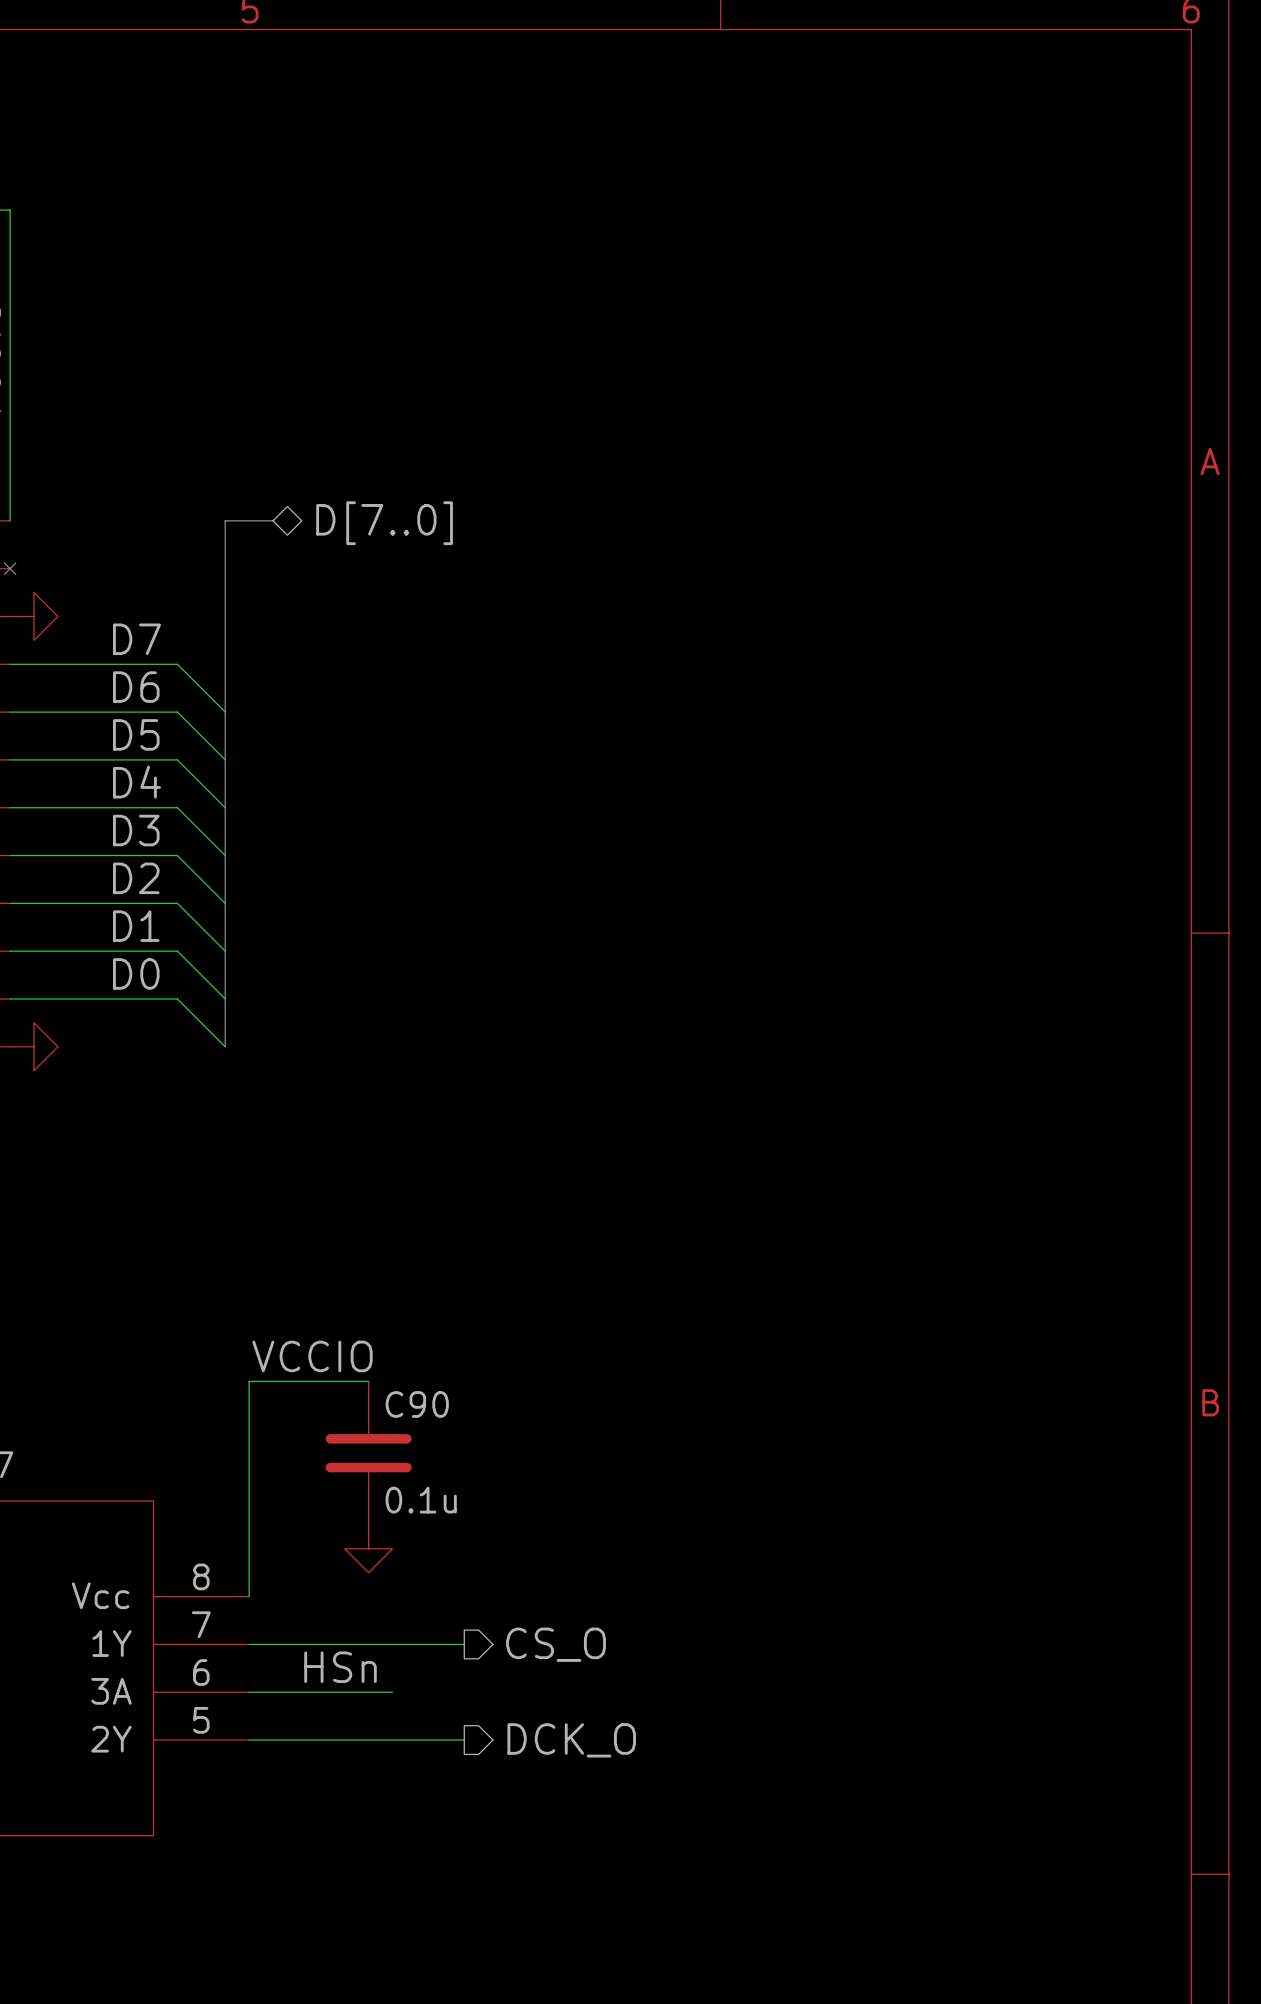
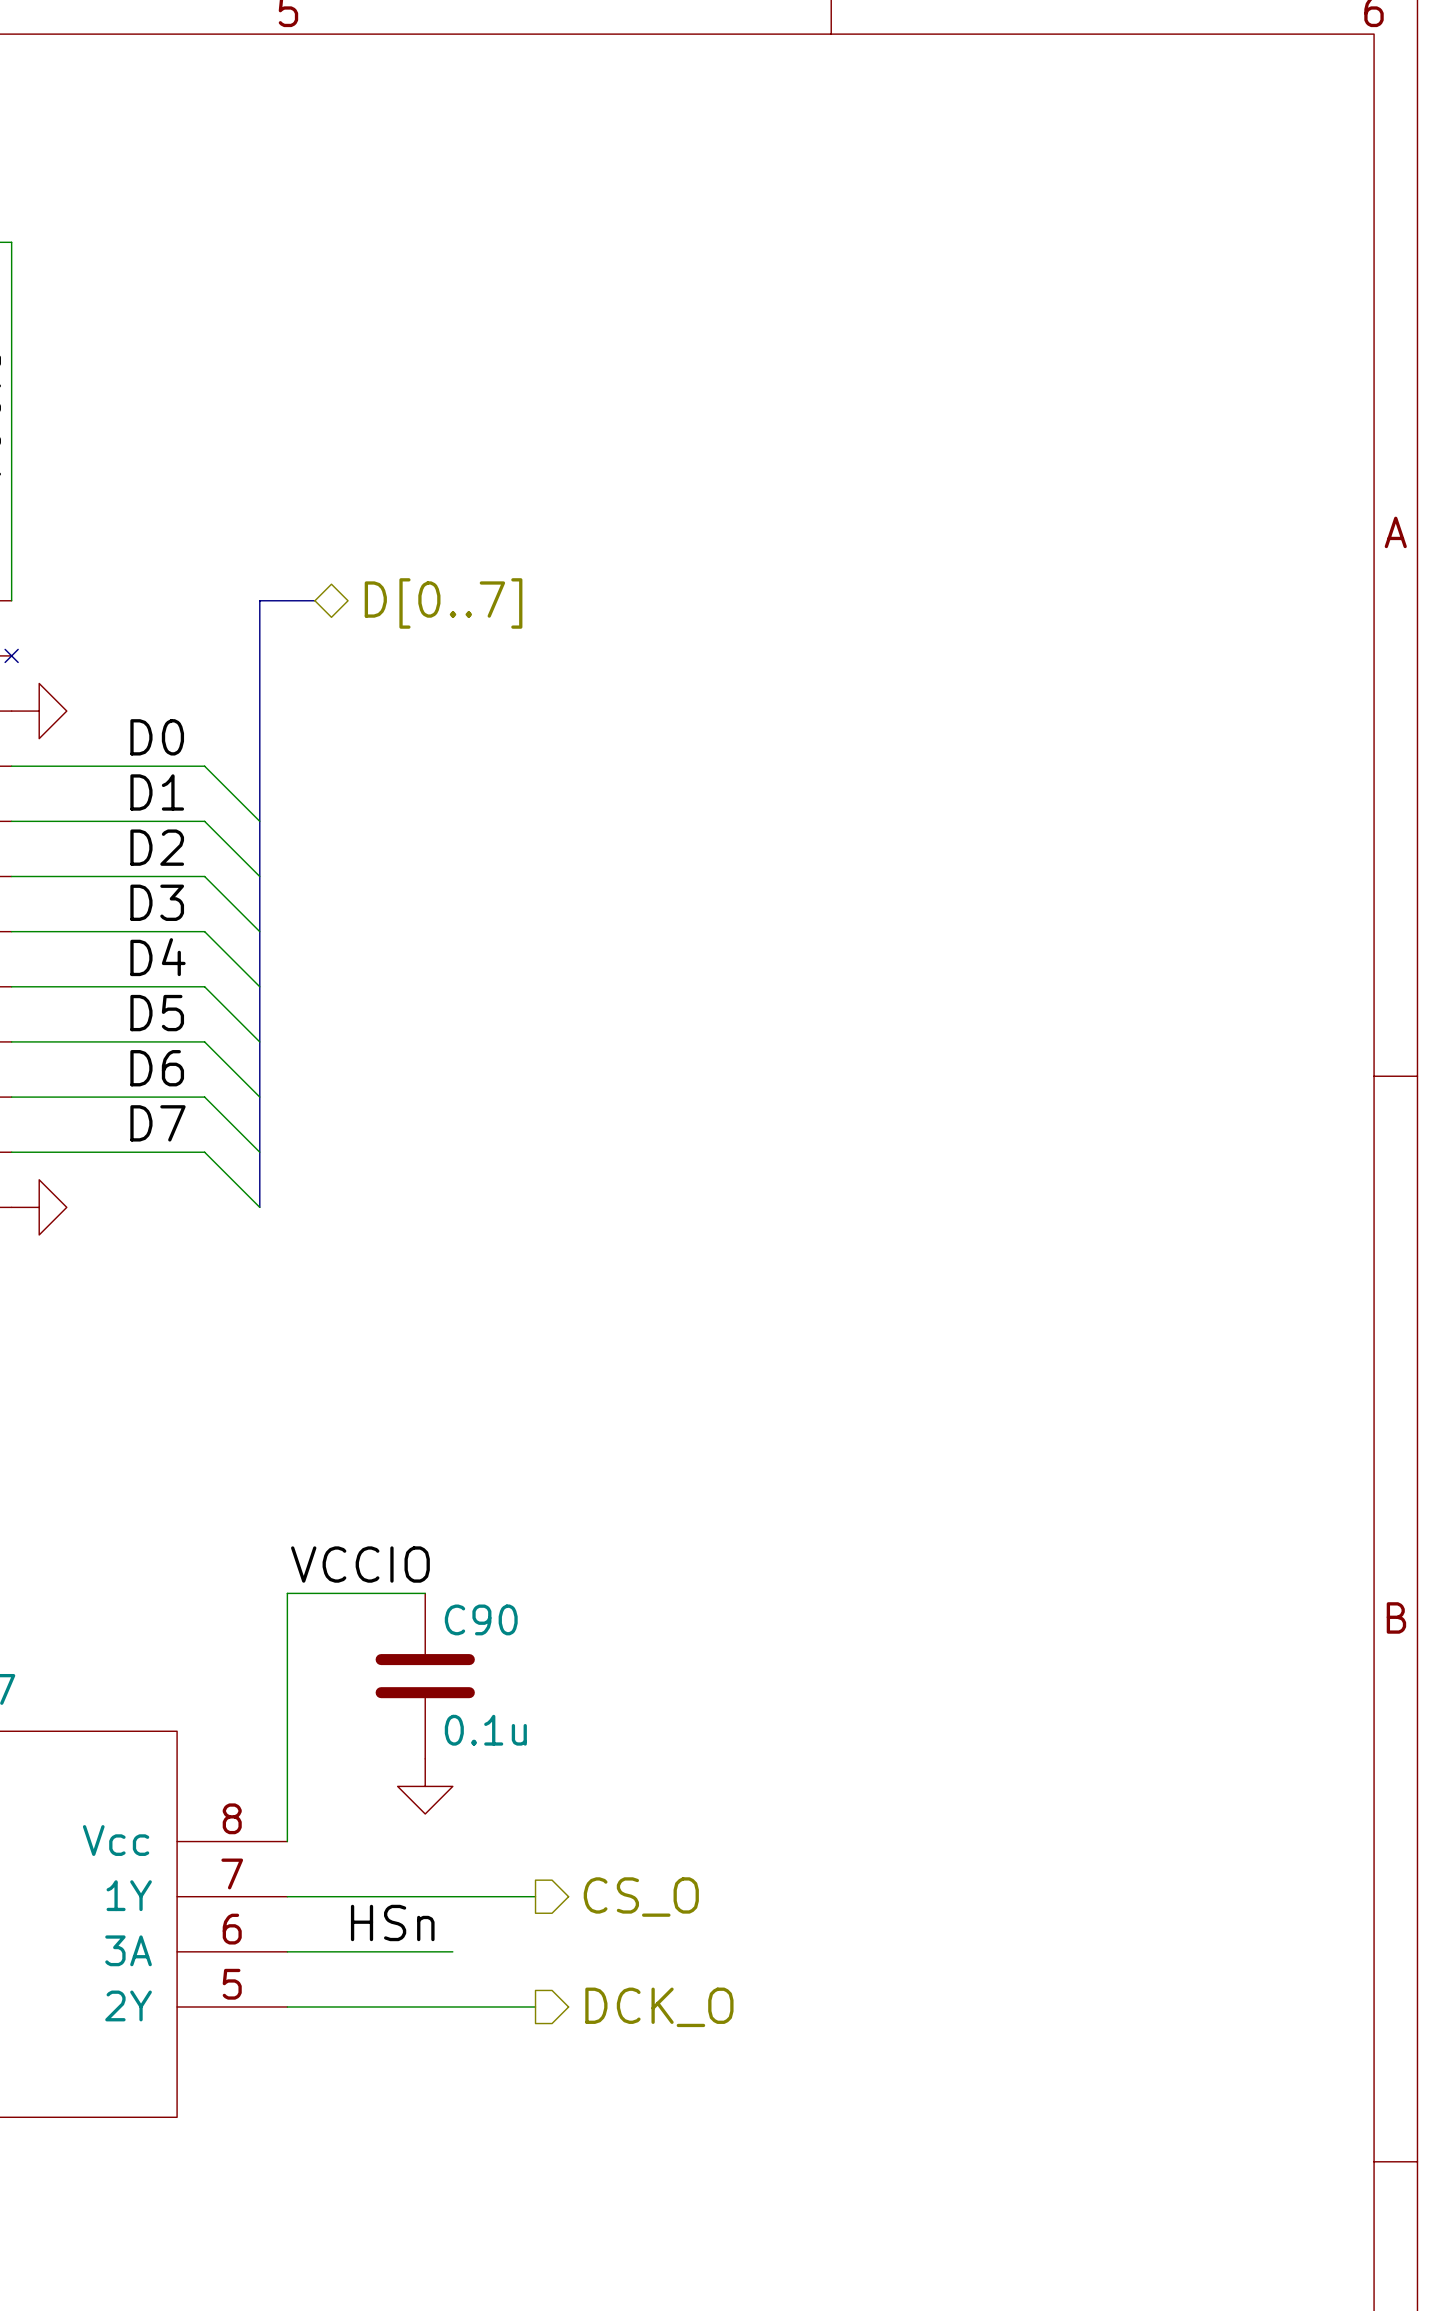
hierarchical label: D[7..0] (384, 523) -> D[0..7] (443, 603)
label: D7 (136, 639) -> D0 (157, 737)
label: D6 (136, 687) -> D1 (157, 792)
label: D5 (136, 734) -> D2 (157, 847)
label: D4 (136, 782) -> D3 (157, 902)
label: D3 (136, 830) -> D4 (157, 957)
label: D2 (136, 878) -> D5 (157, 1013)
label: D1 (136, 926) -> D6 (157, 1068)
label: D0 (136, 973) -> D7 (157, 1123)

